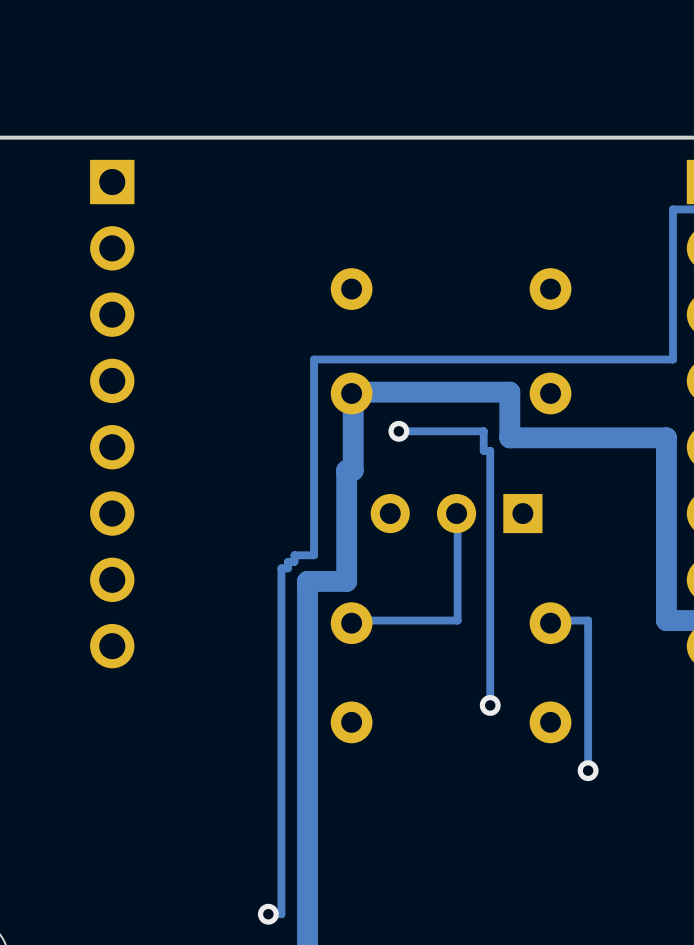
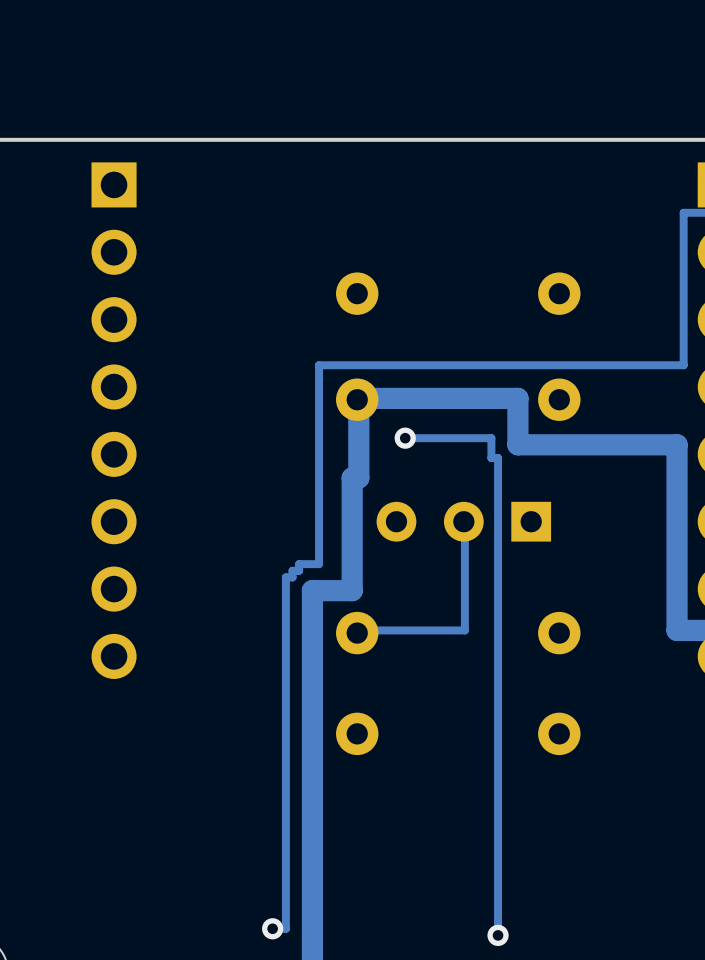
track: (550, 623) (548, 620) (588, 620) (588, 770) -> none
track: none -> (498, 716) (498, 935)
via: (490, 705) -> none
via: (588, 770) -> none
via: none -> (498, 935)

